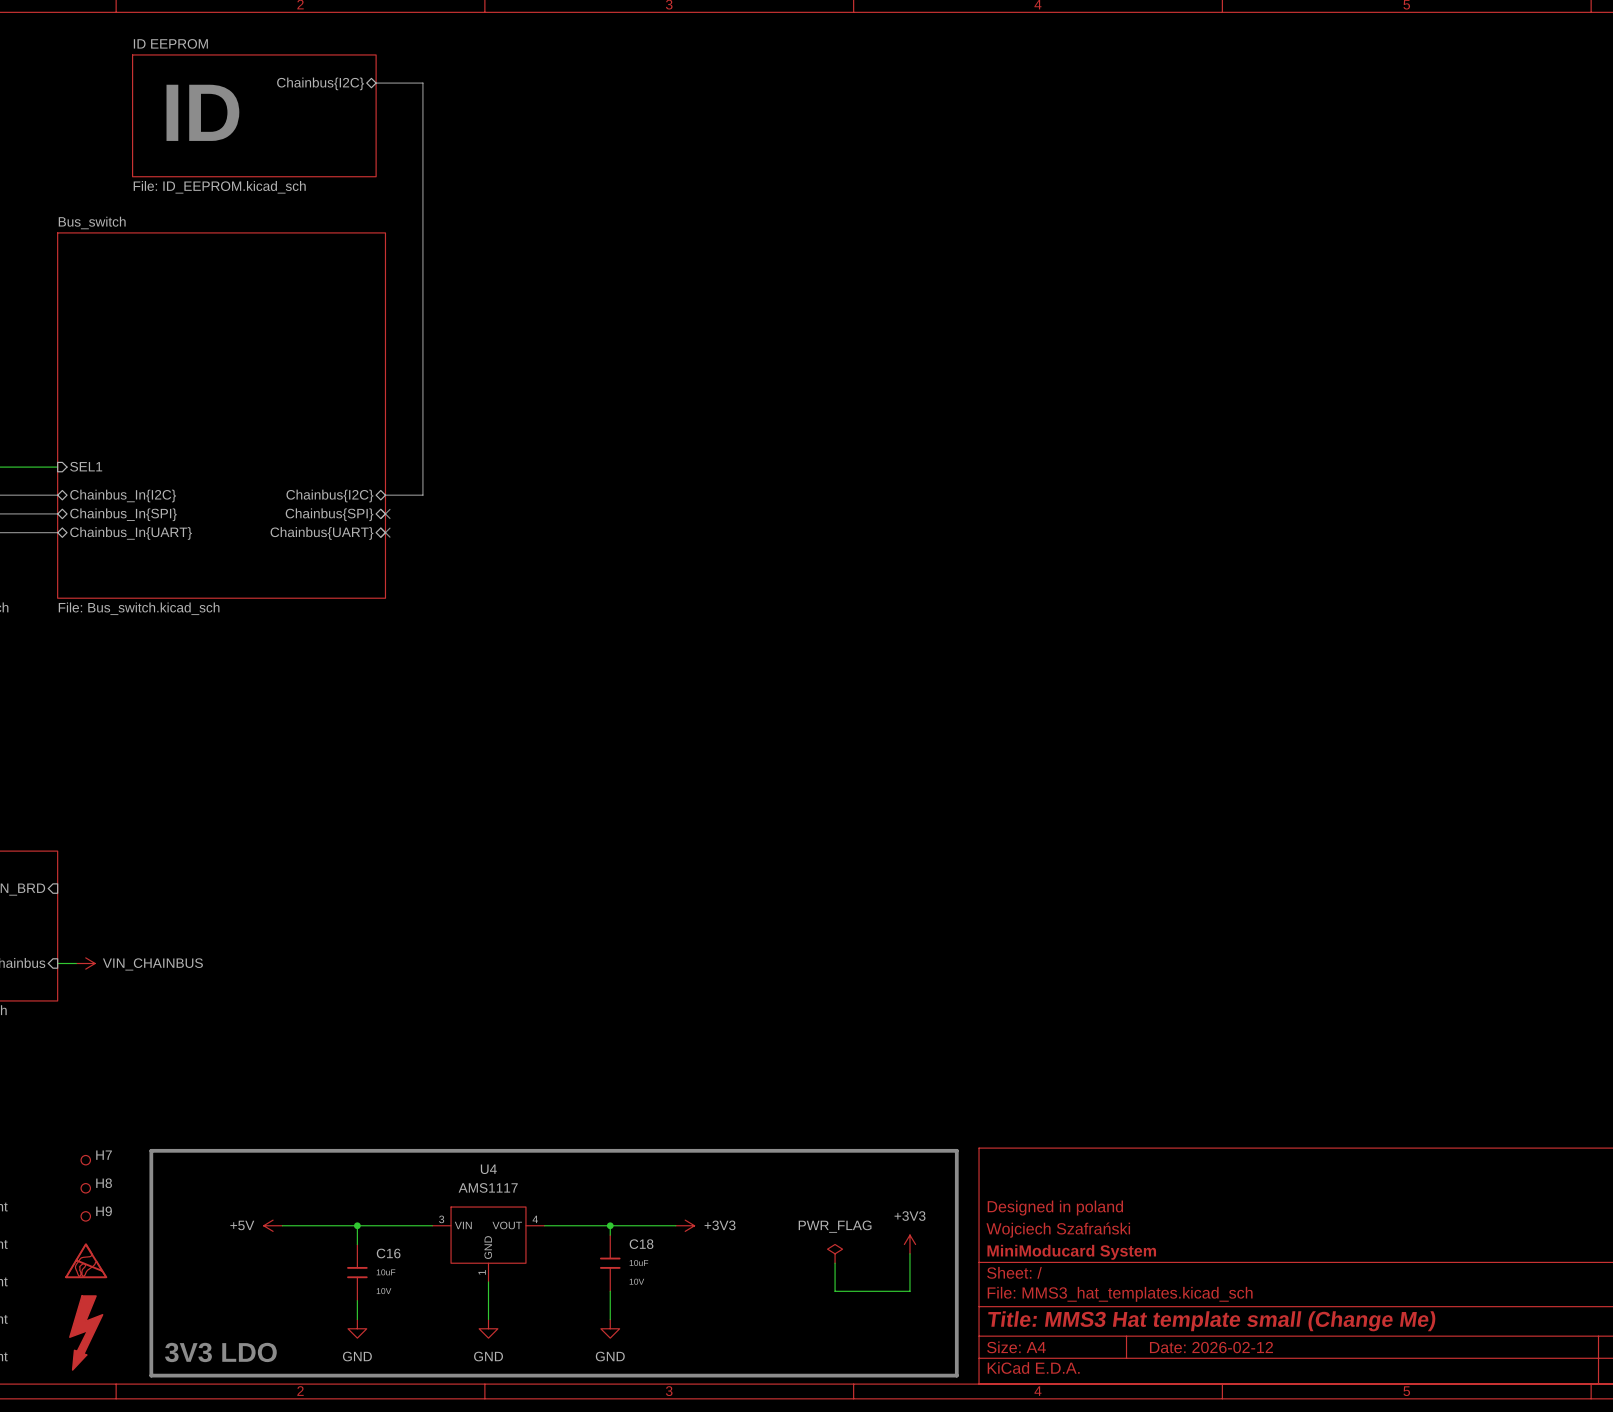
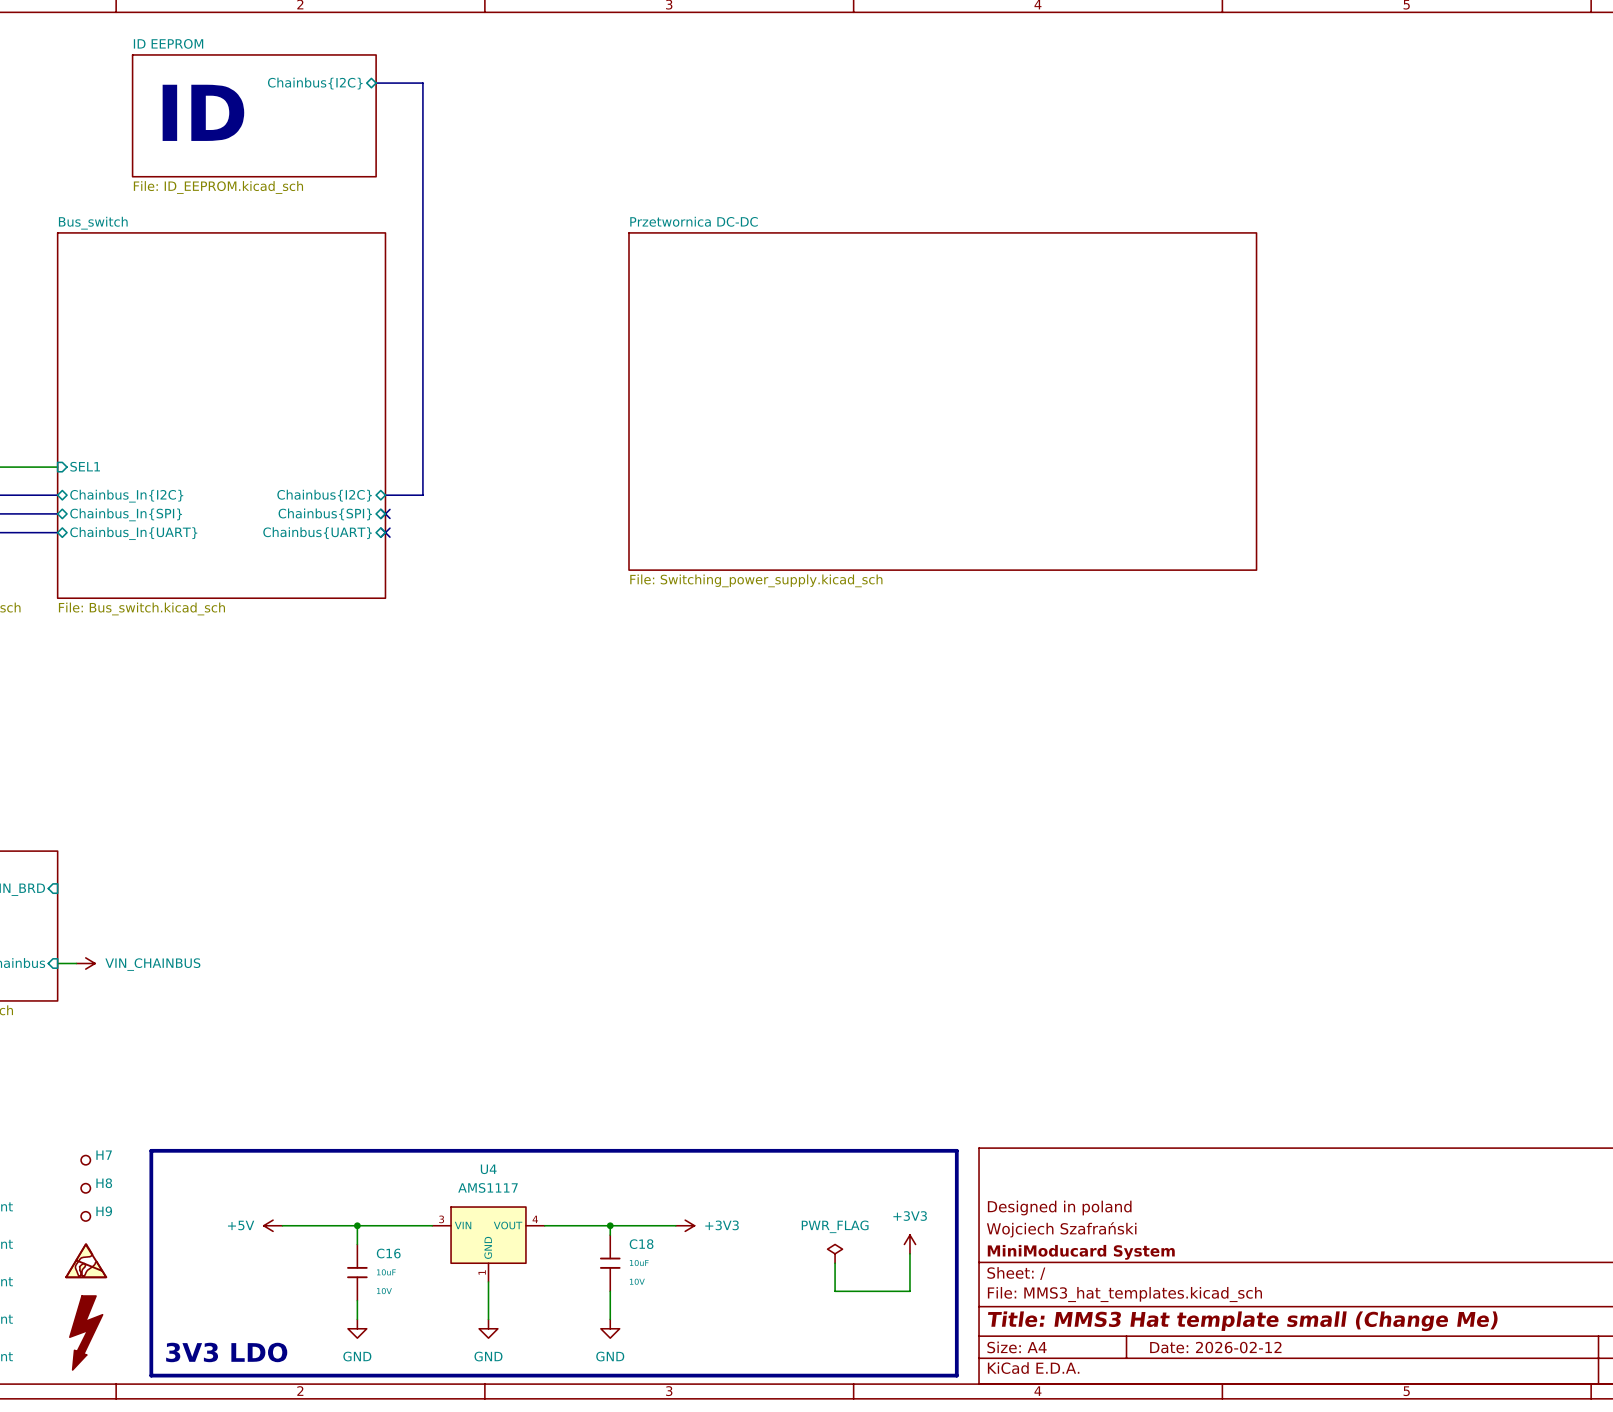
sheet Przetwornica DC-DC: none -> File: Switching_power_supply.kicad_sch (942, 401)

